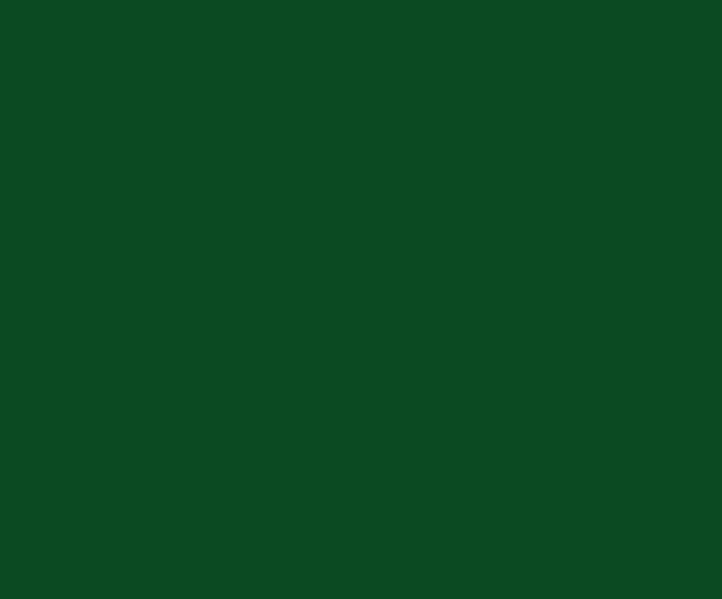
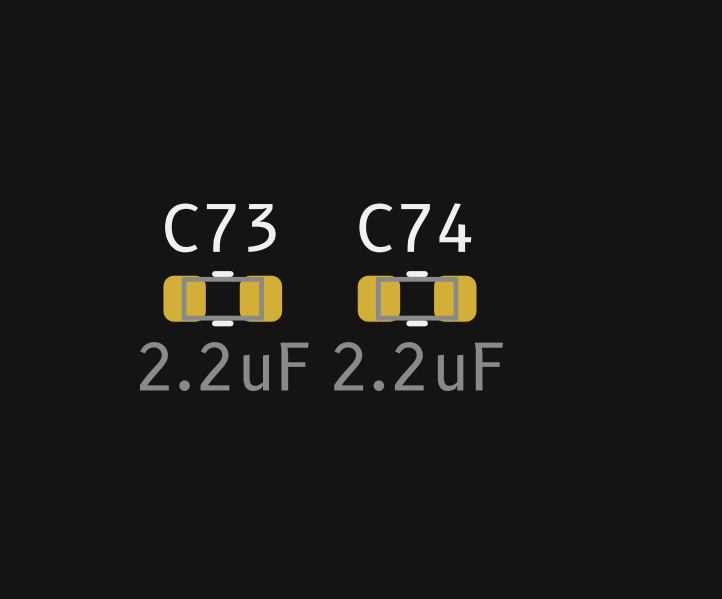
C73: none -> 2.2uF (222, 298)
C74: none -> 2.2uF (417, 298)

